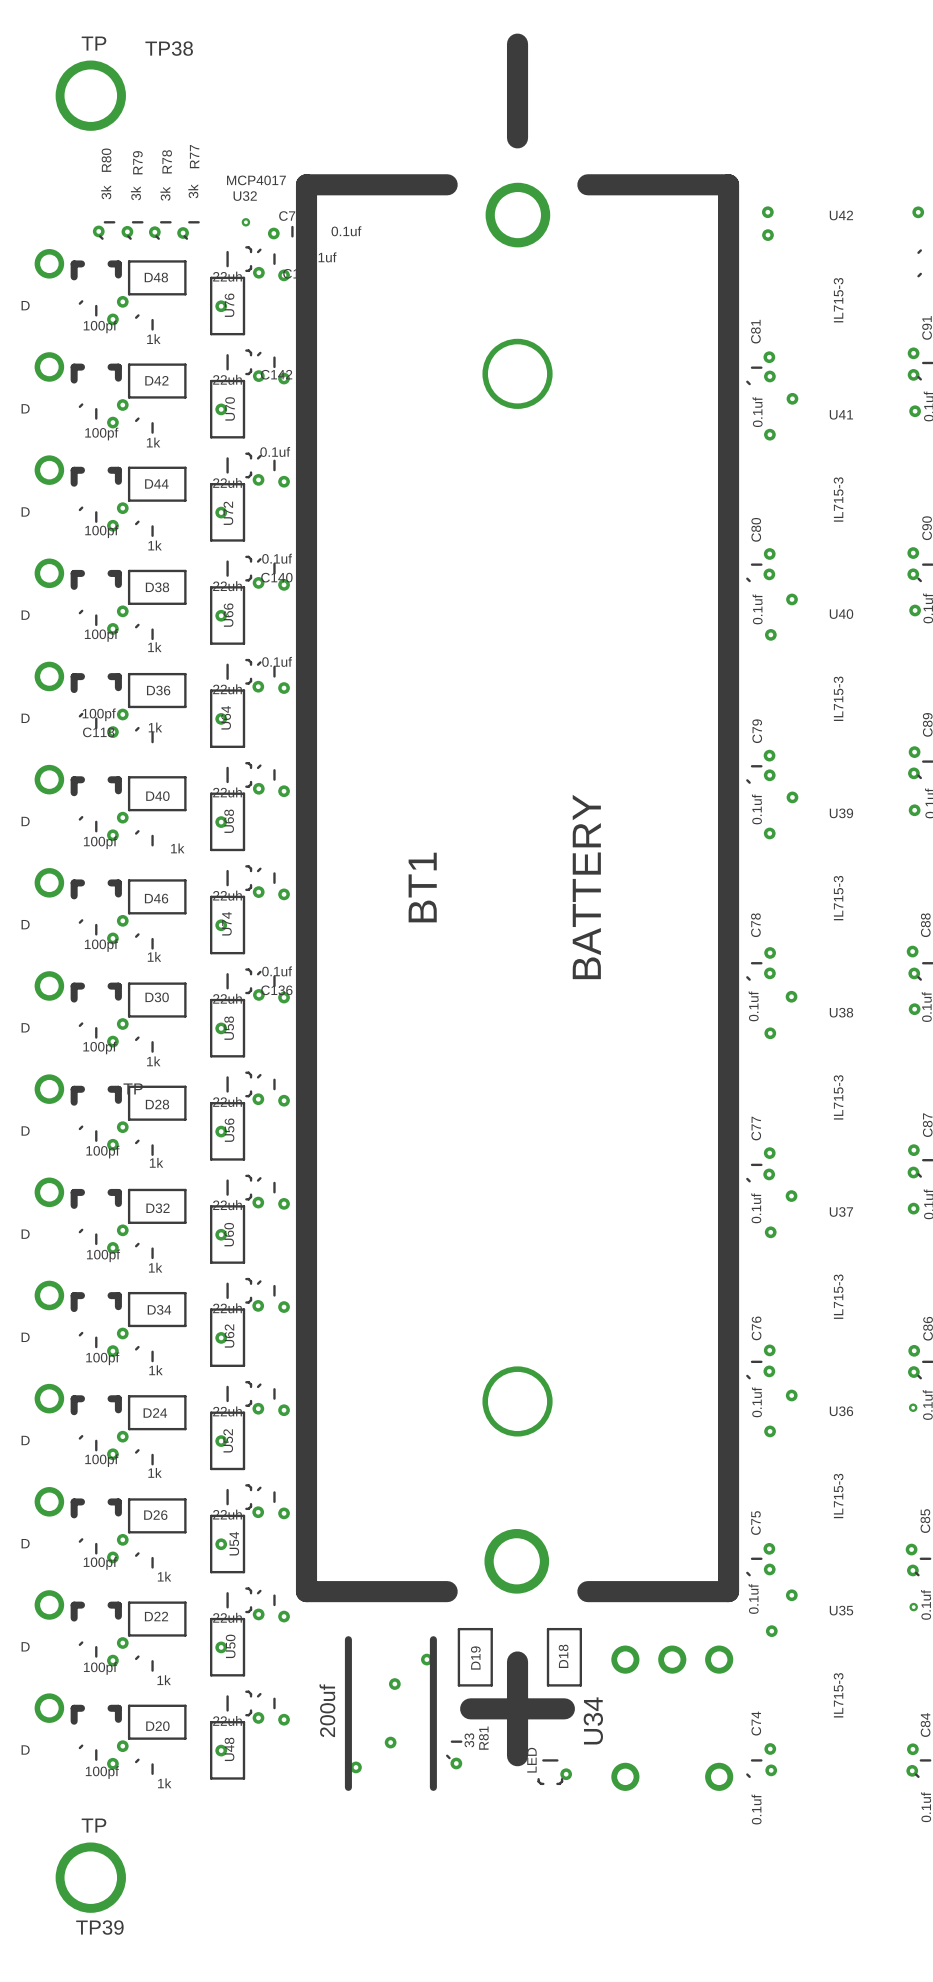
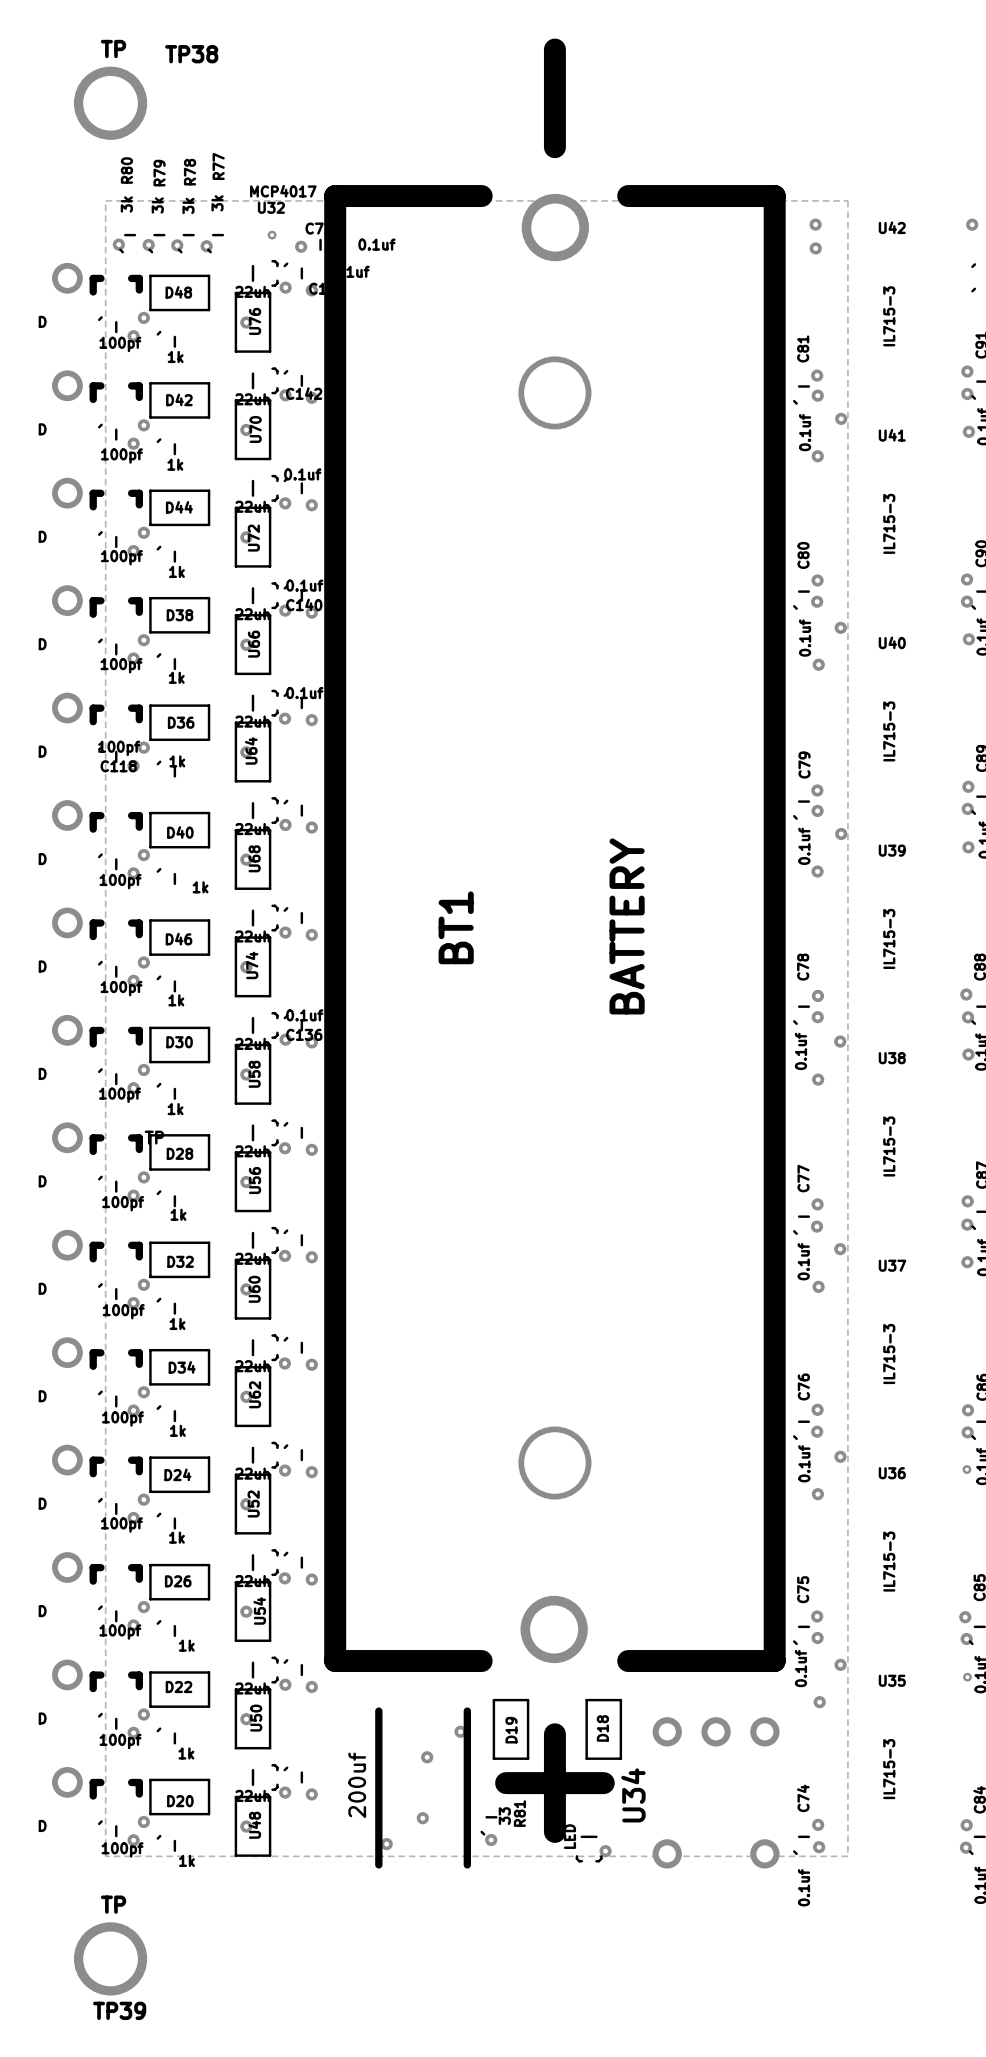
zone outline: none -> (105, 200) (105, 1856) (847, 1856) (847, 200) (105, 200)

